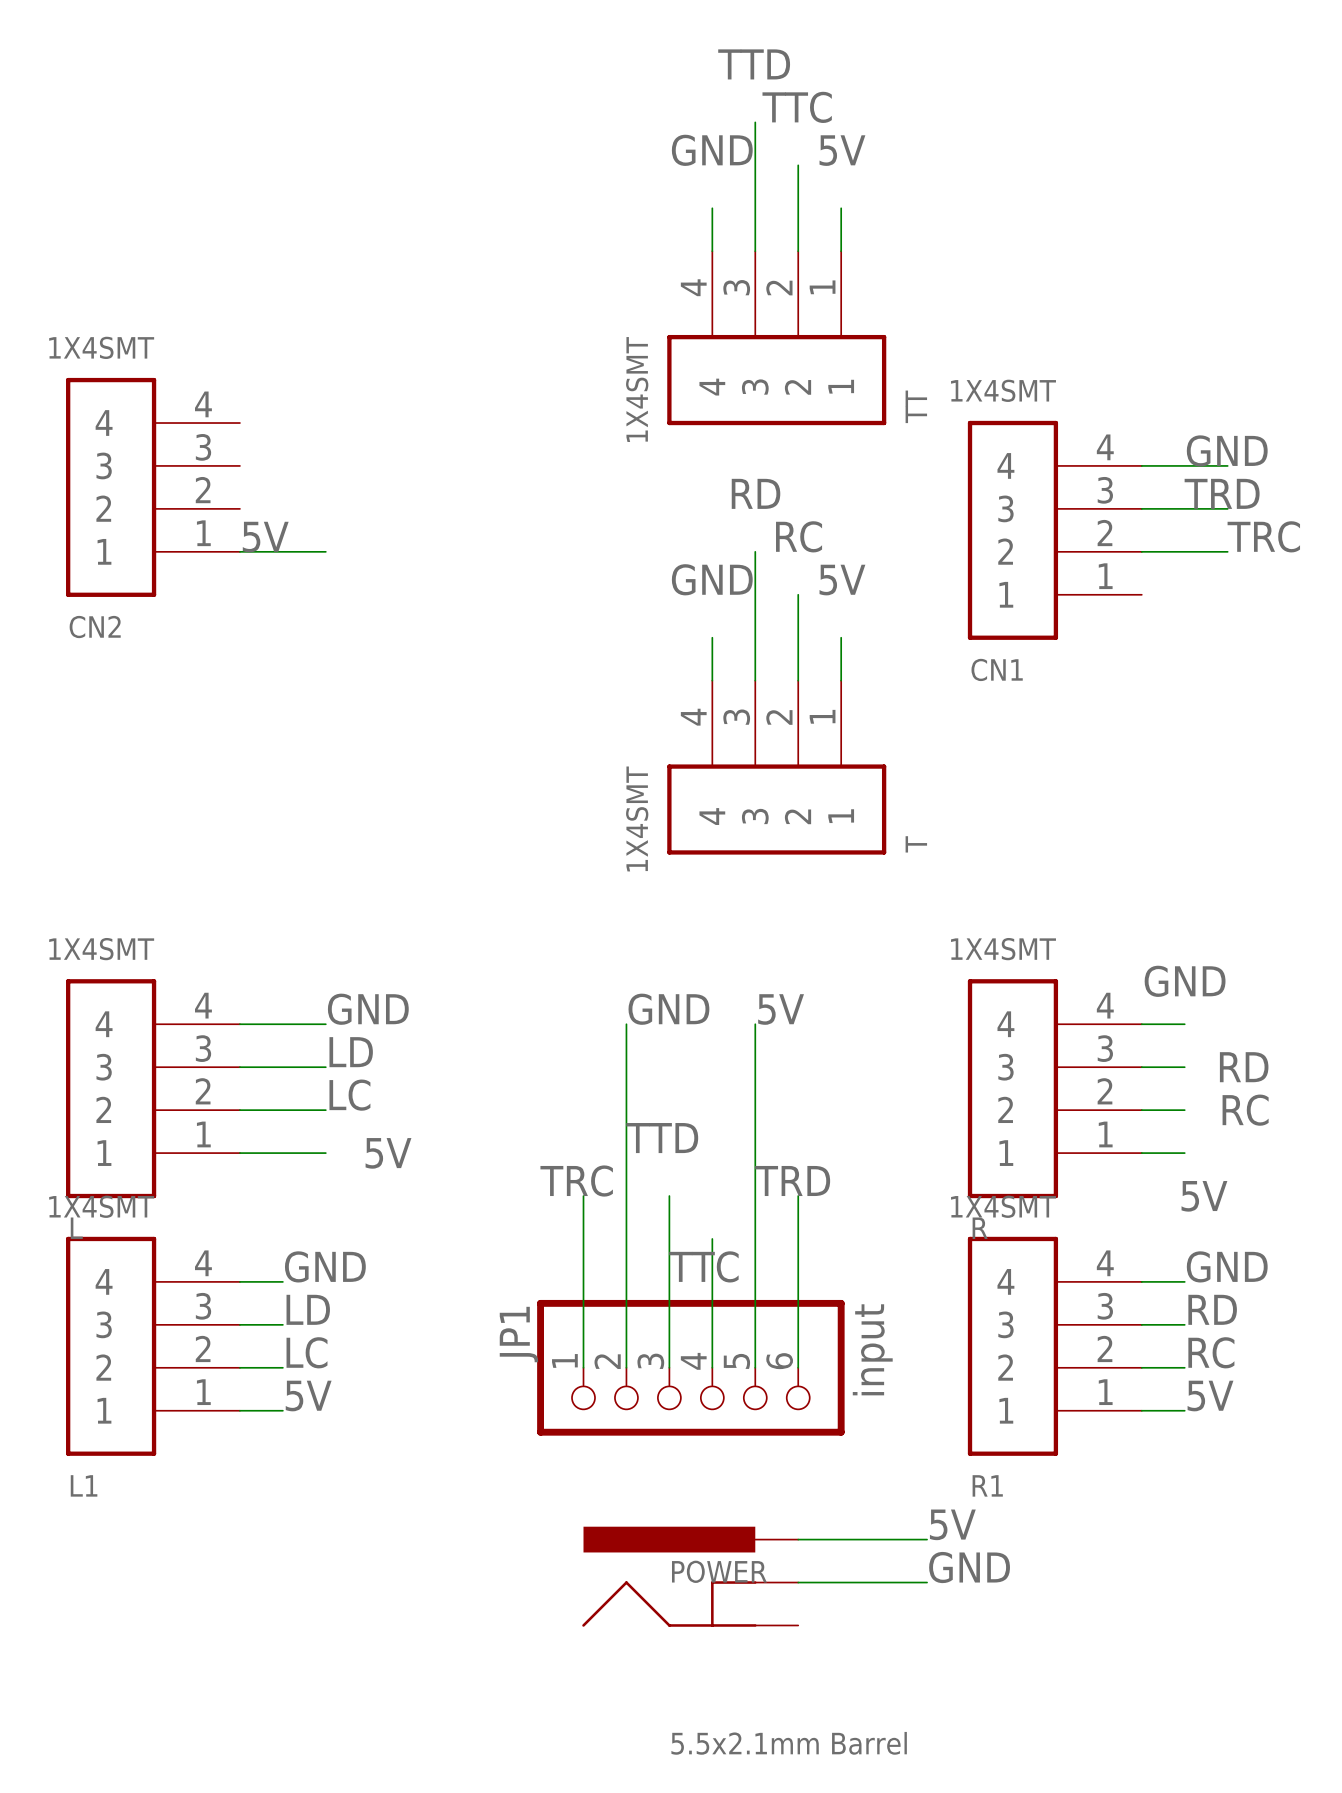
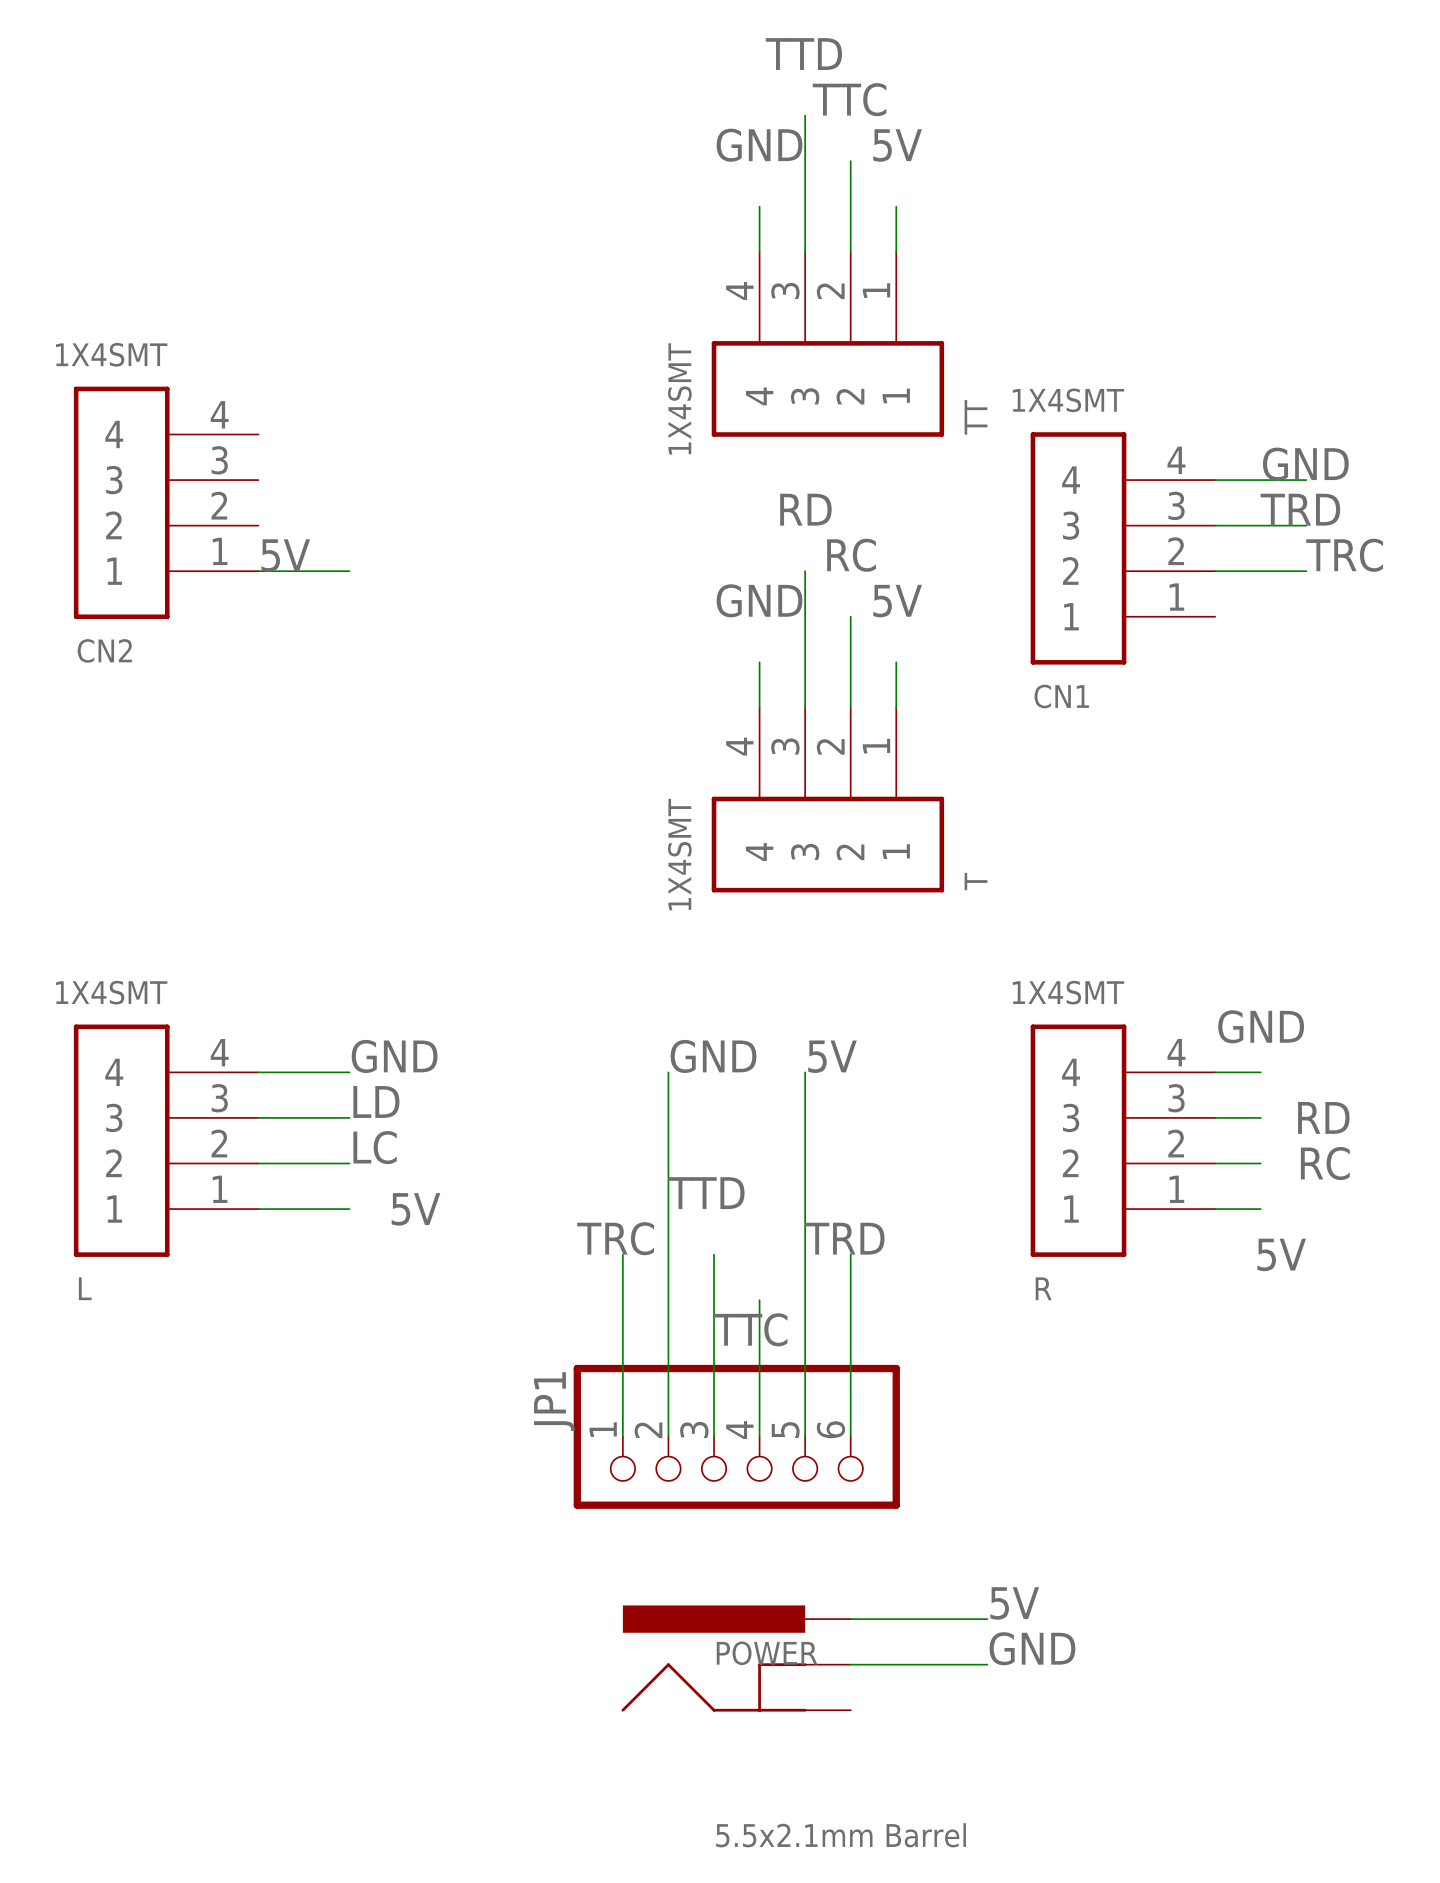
label: GND (325, 1266) -> none
label: GND (1227, 1266) -> none
wire: (239, 1281) (282, 1281) -> none
wire: (1141, 1281) (1184, 1281) -> none
label: LD (308, 1309) -> none
label: RD (1212, 1309) -> none
wire: (239, 1324) (282, 1324) -> none
wire: (1141, 1324) (1184, 1324) -> none
L1: 1X4SMT (152, 1346) -> none
R1: 1X4SMT (1054, 1346) -> none
JP1 value: input (872, 1349) -> none
label: LC (306, 1352) -> none
label: RC (1211, 1352) -> none
wire: (239, 1367) (282, 1367) -> none
wire: (1141, 1367) (1184, 1367) -> none
label: 5V (308, 1396) -> none
label: 5V (1210, 1396) -> none
wire: (239, 1410) (282, 1410) -> none
wire: (1141, 1410) (1184, 1410) -> none

